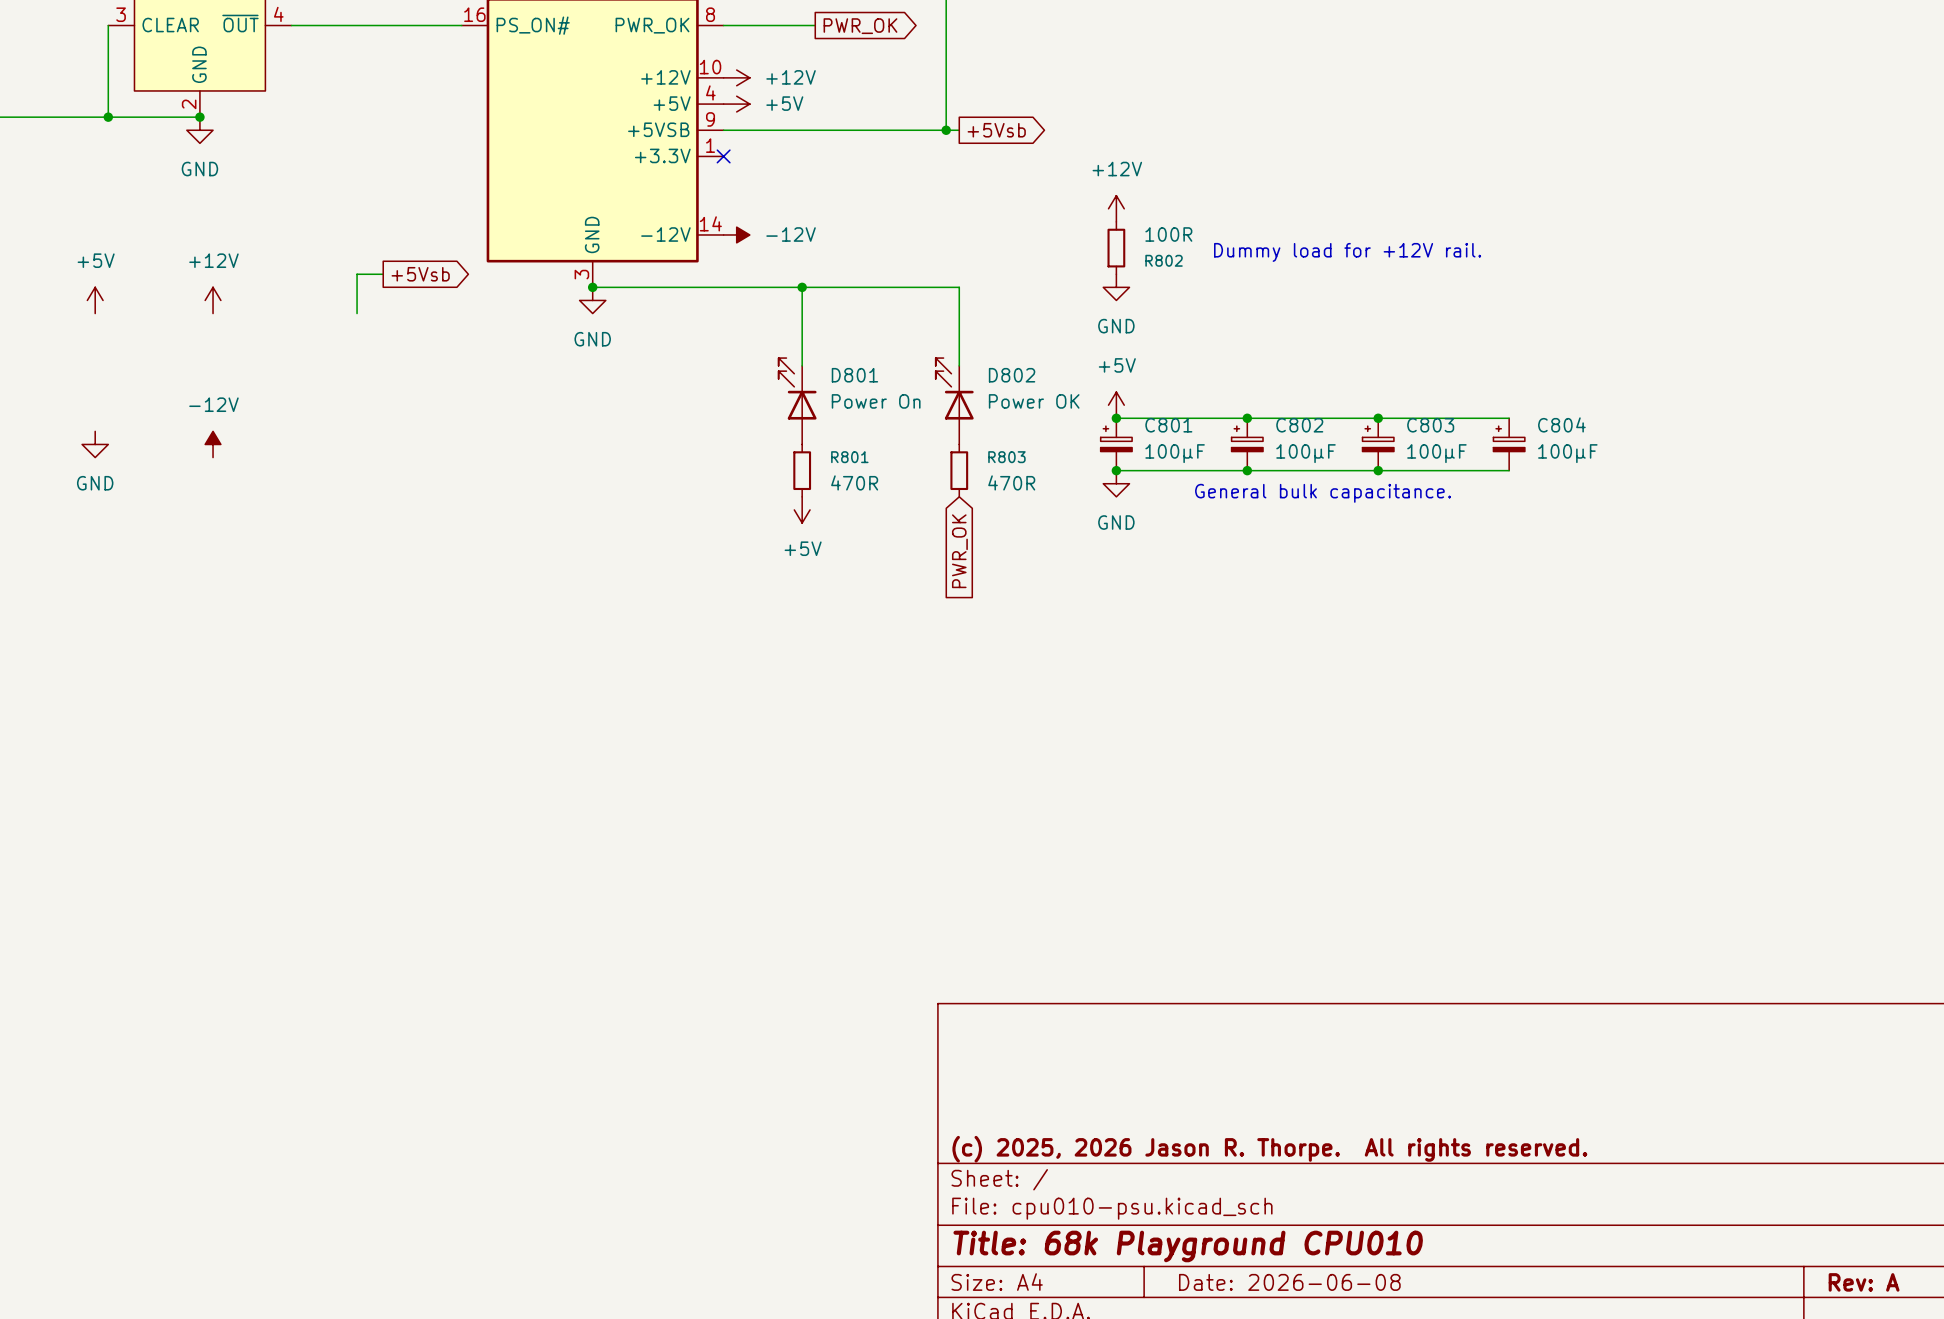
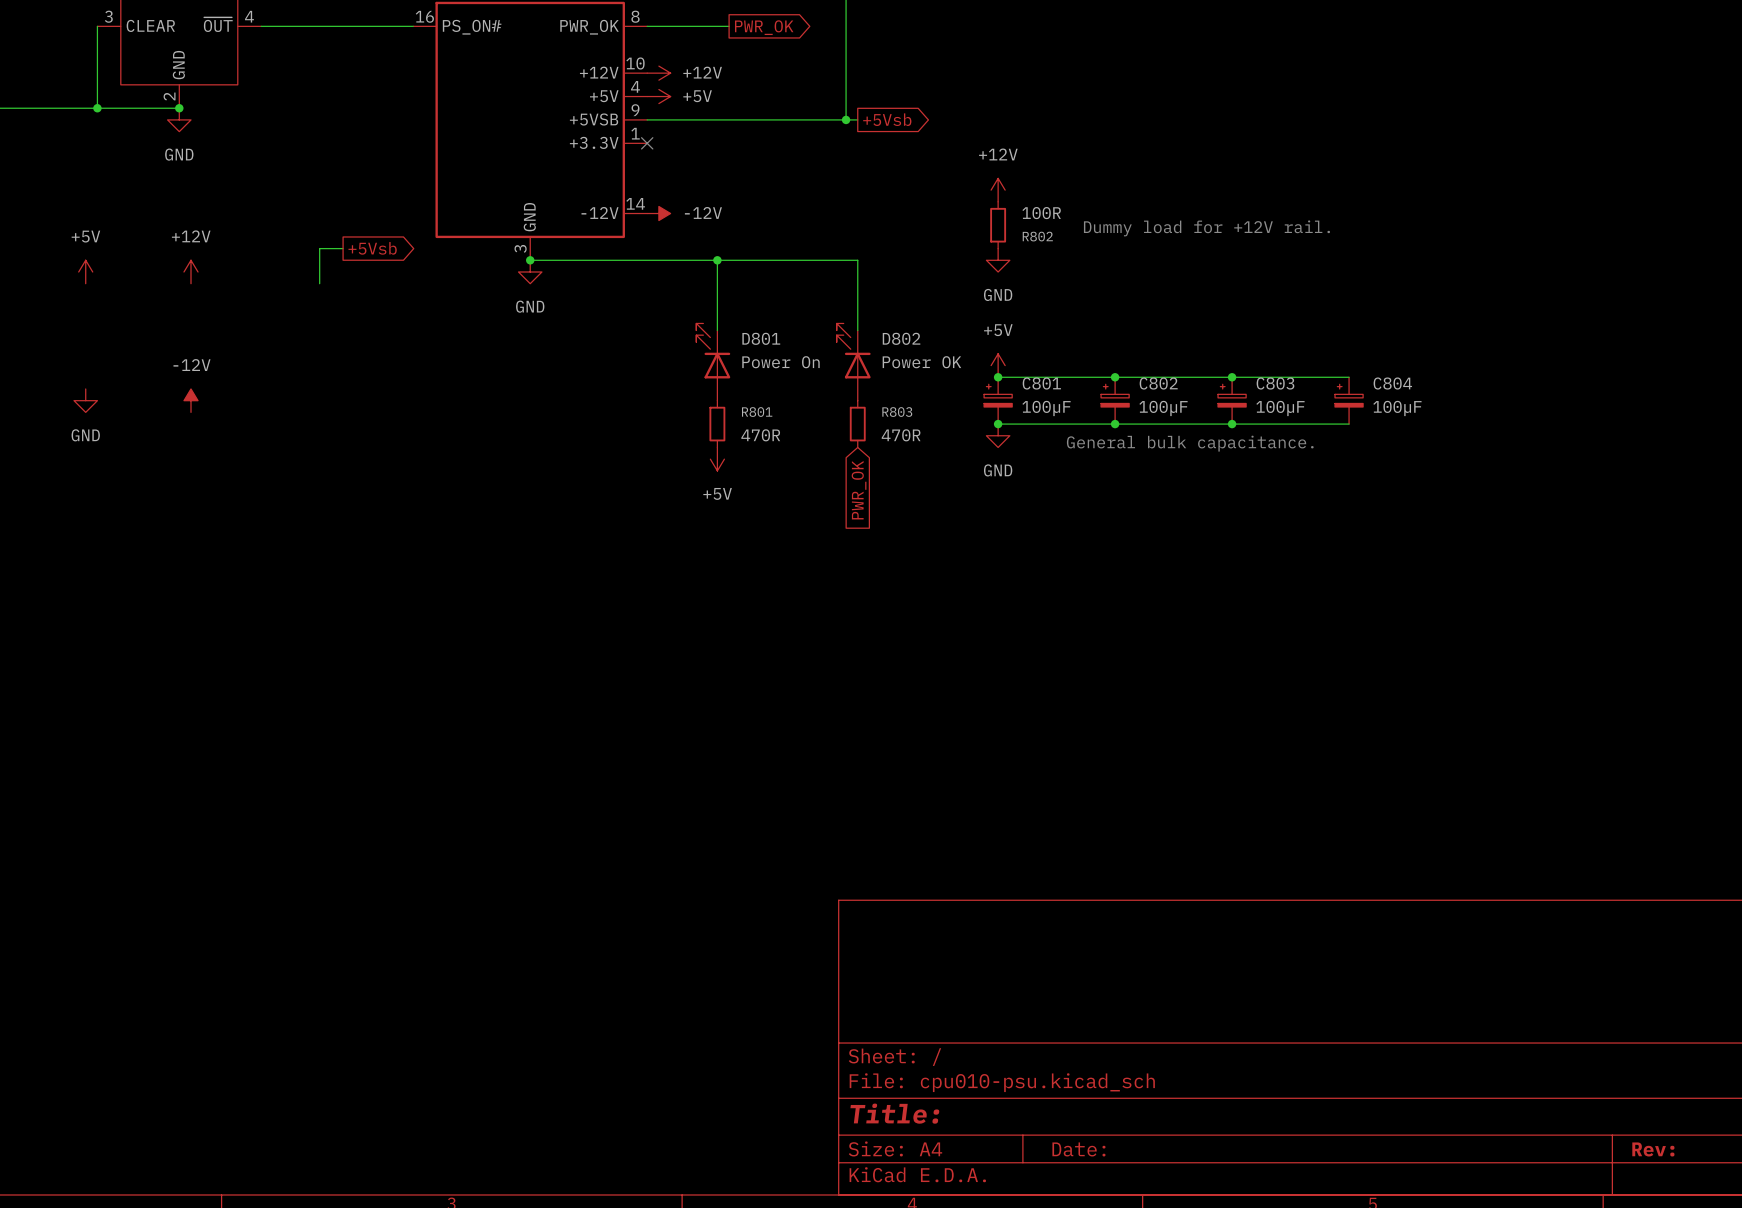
title block: (c) 2025, 2026 Jason R. Thorpe. All rights reserved. (1269, 1149) -> none
title block: Title: 68k Playground CPU010 (1188, 1246) -> Title: (894, 1113)
title block: Date: 2026-06-08 (1289, 1282) -> Date: (1078, 1149)
title block: Rev: A (1864, 1282) -> Rev: (1653, 1149)

